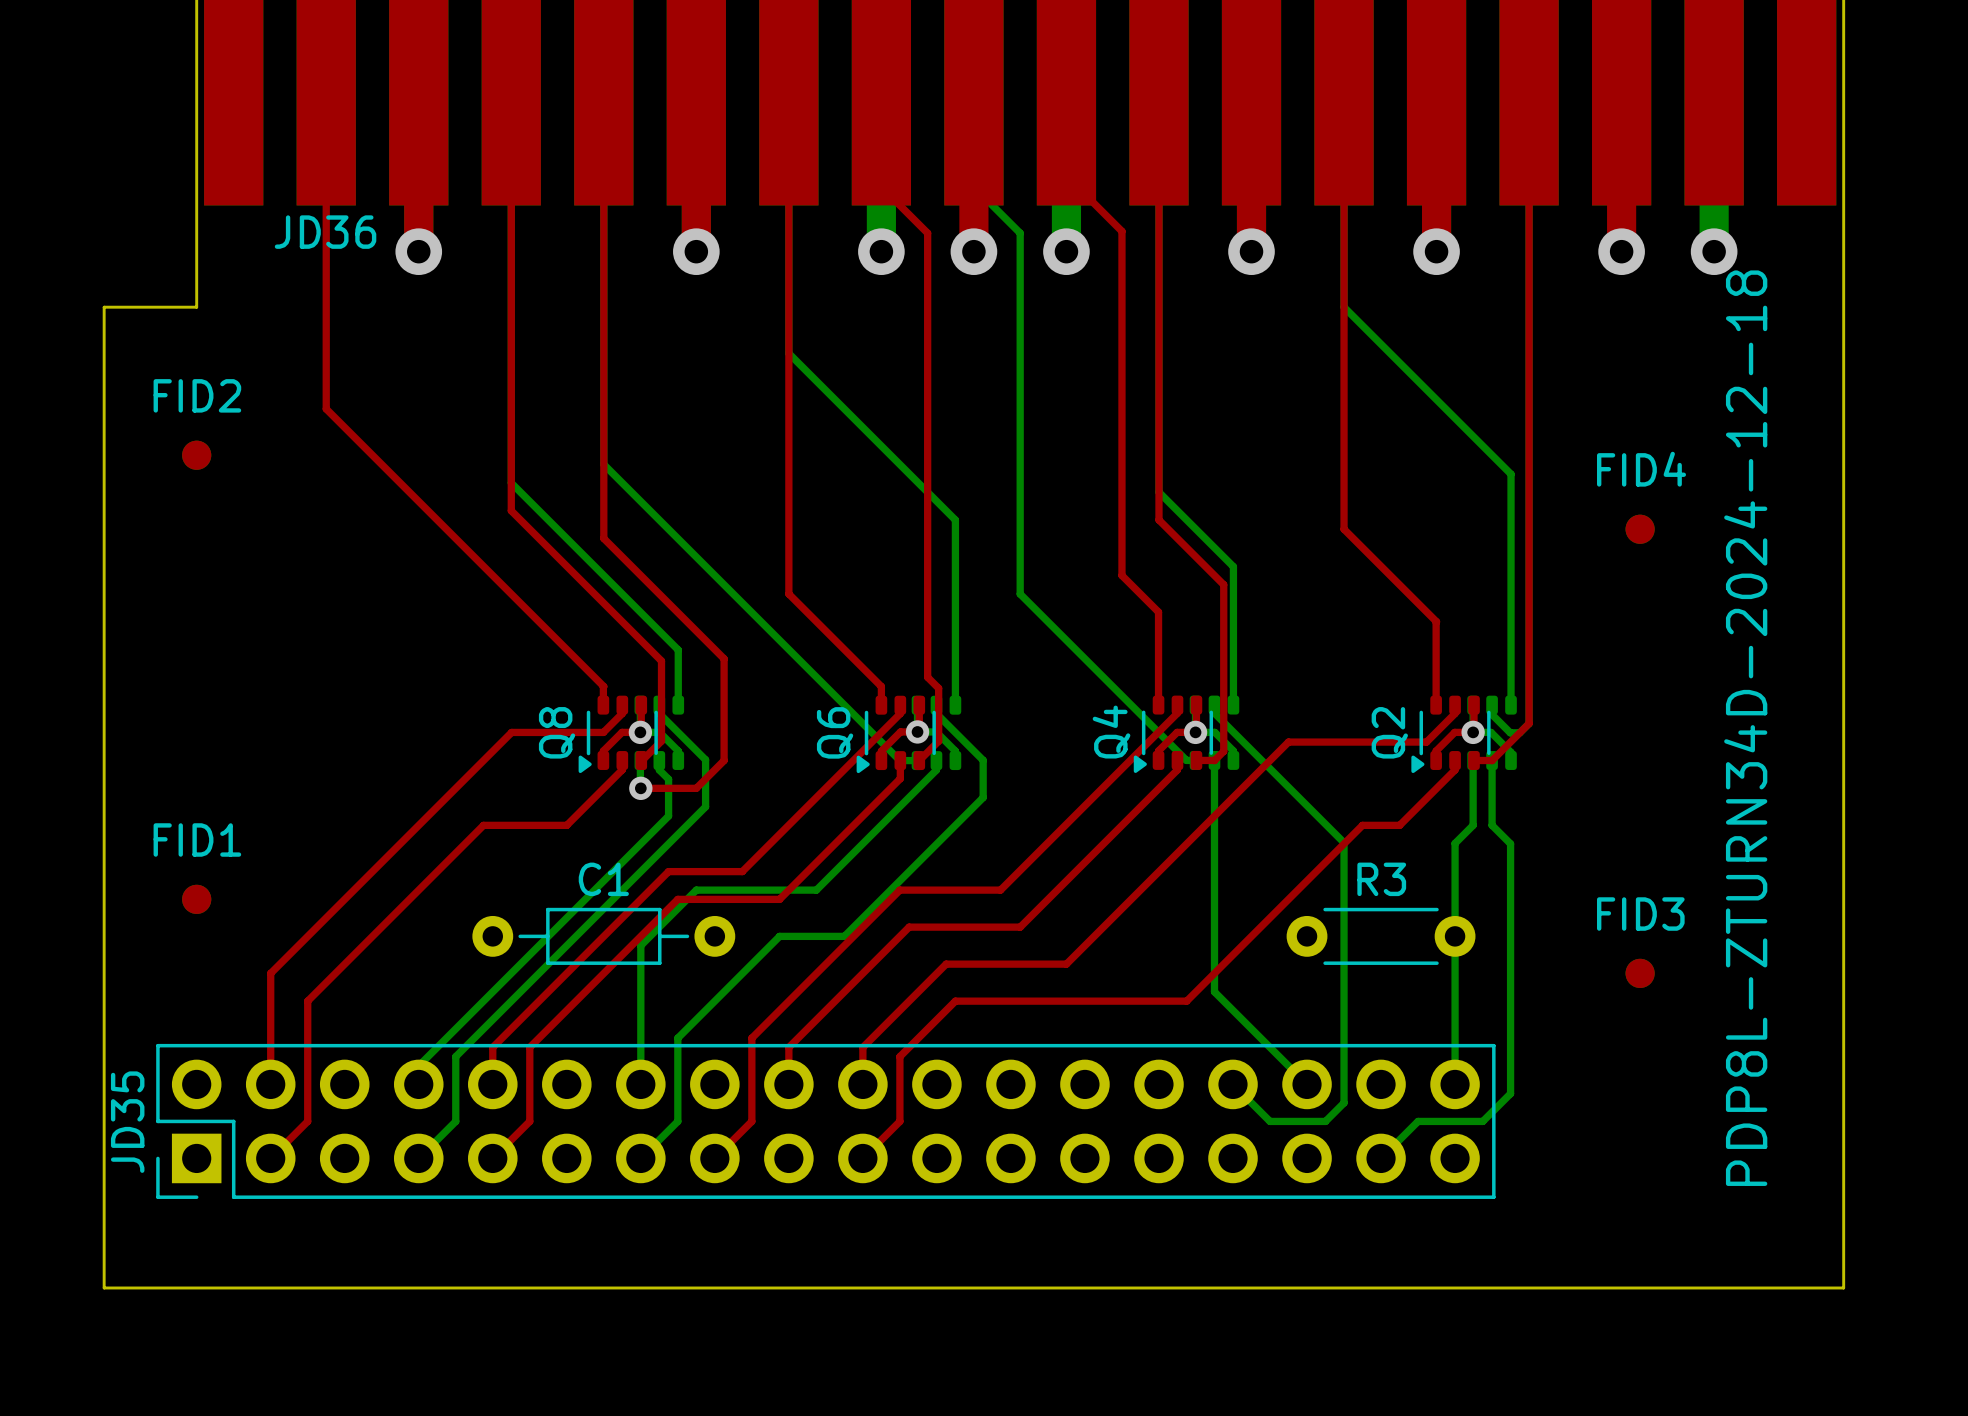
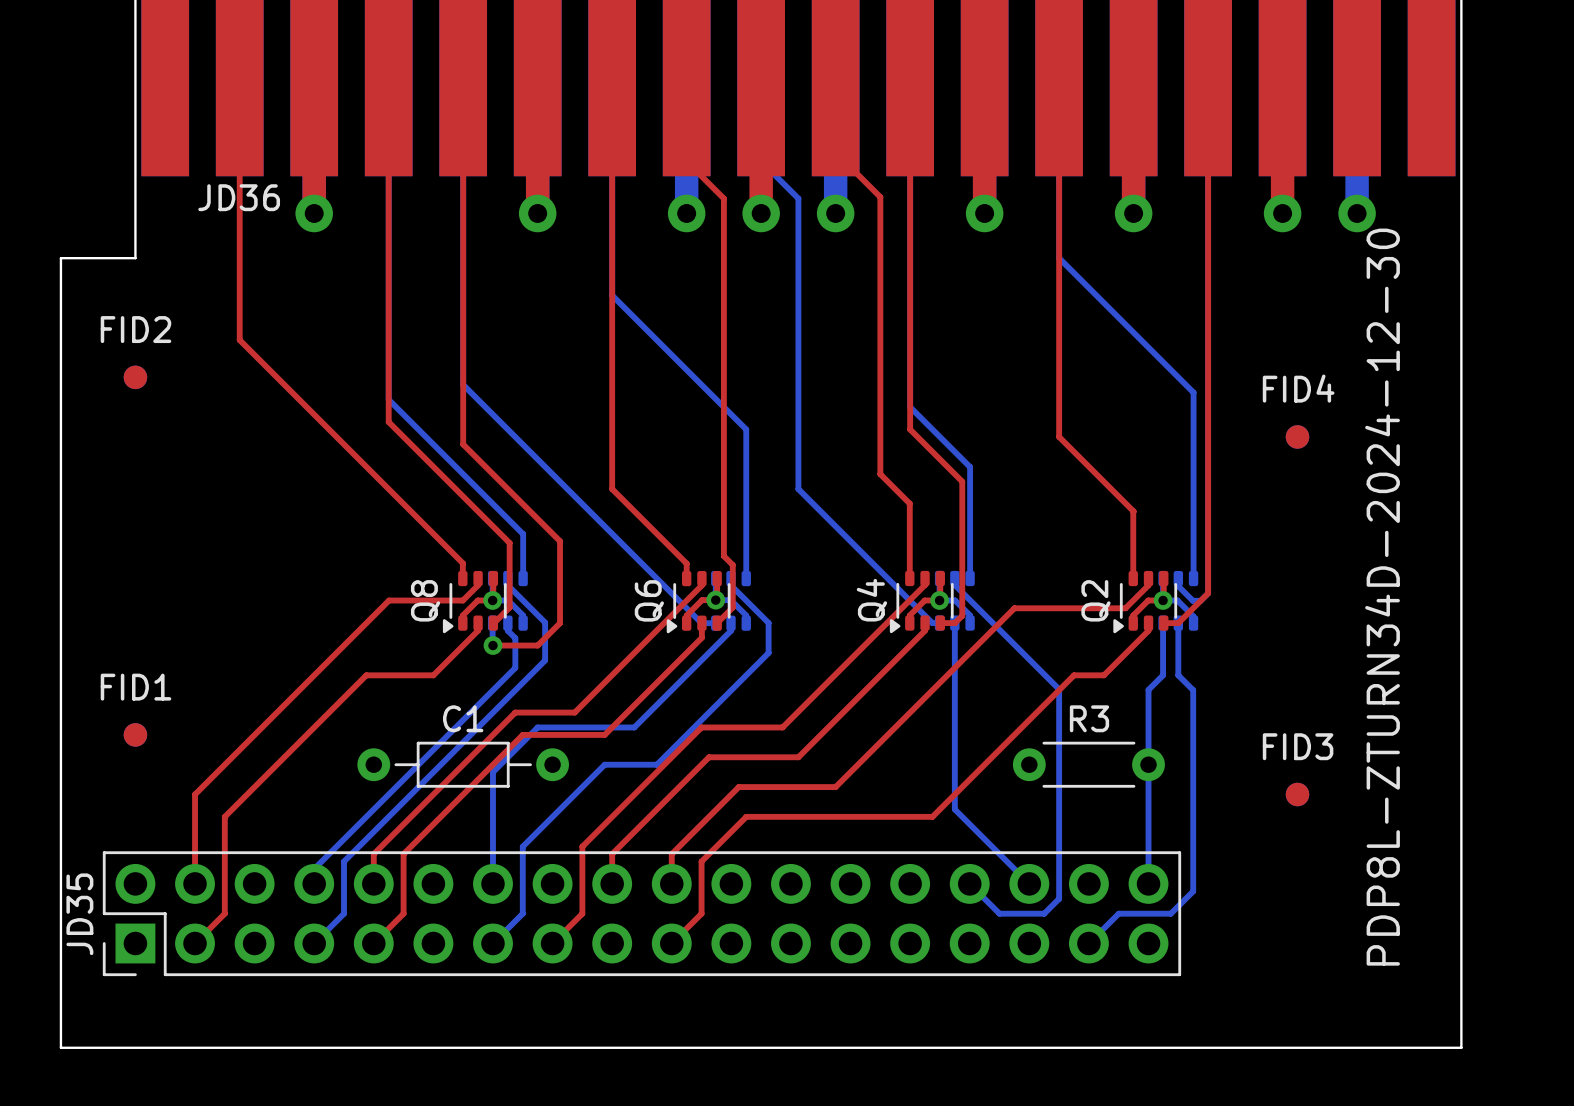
text: PDP8L-ZTURN34D-2024-12-18 (1745, 728) -> PDP8L-ZTURN34D-2024-12-30 (1382, 597)

